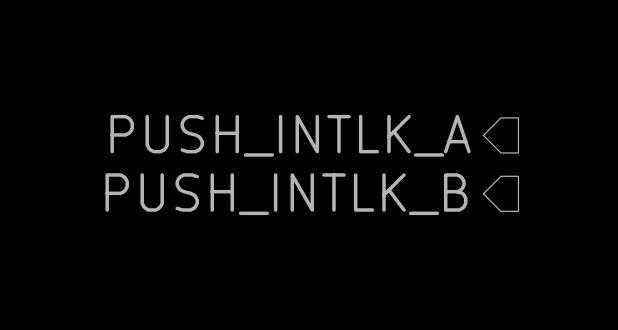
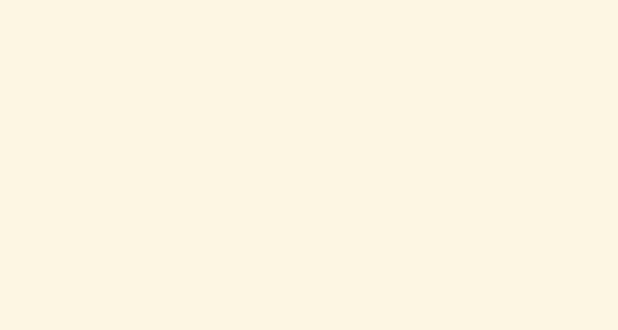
hierarchical label: PUSH_INTLK_A (290, 135) -> none
hierarchical label: PUSH_INTLK_B (286, 194) -> none

